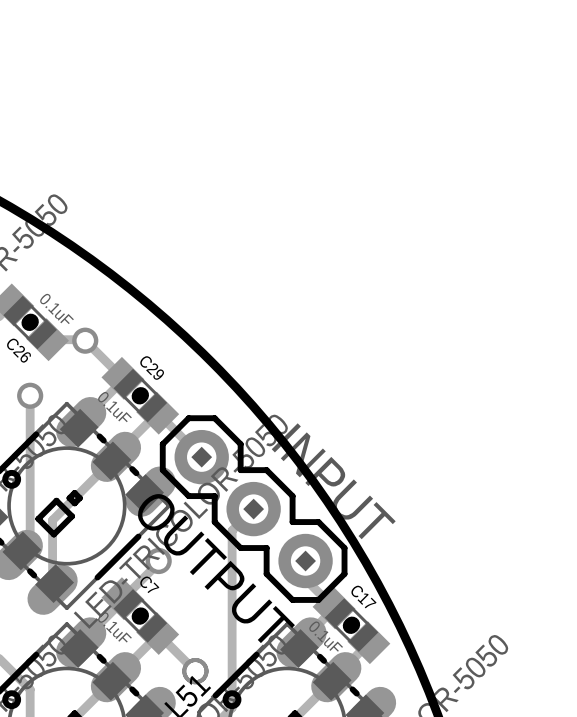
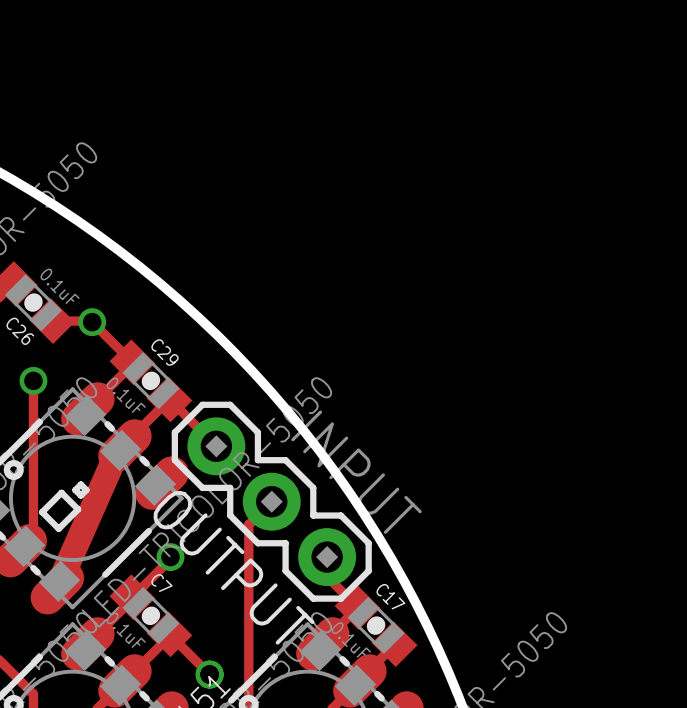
track: (107, 465) (52, 520) (52, 589) -> (116, 454) (57, 587)

